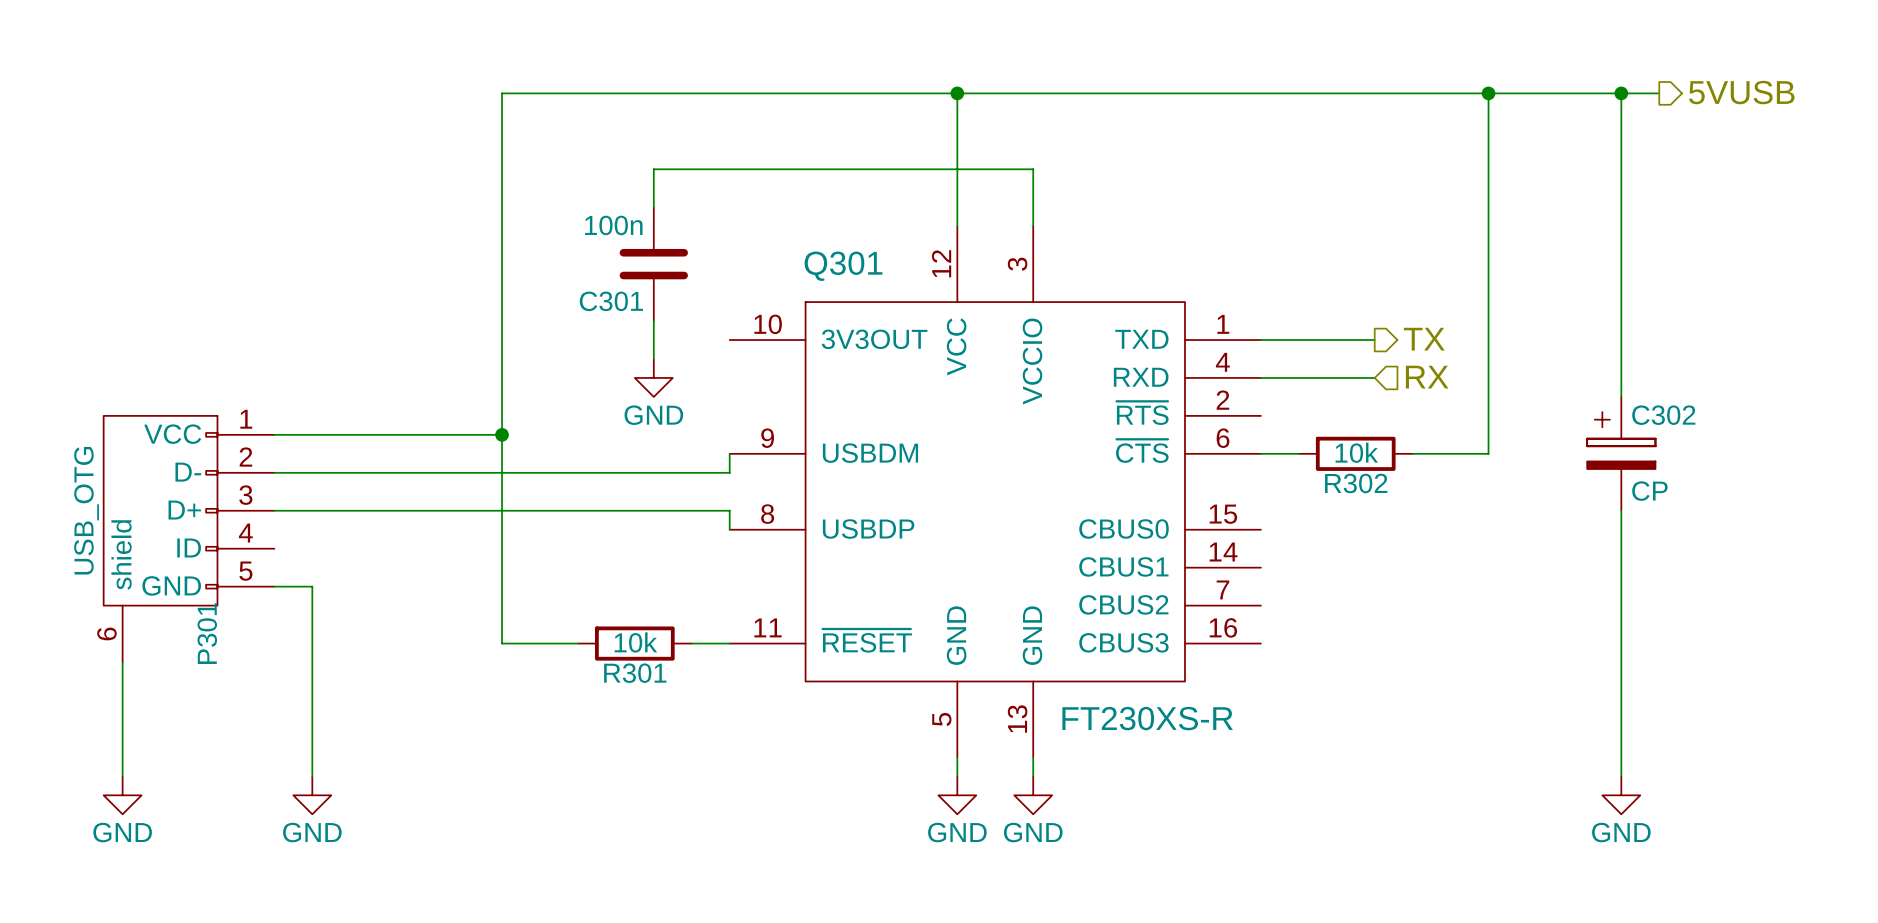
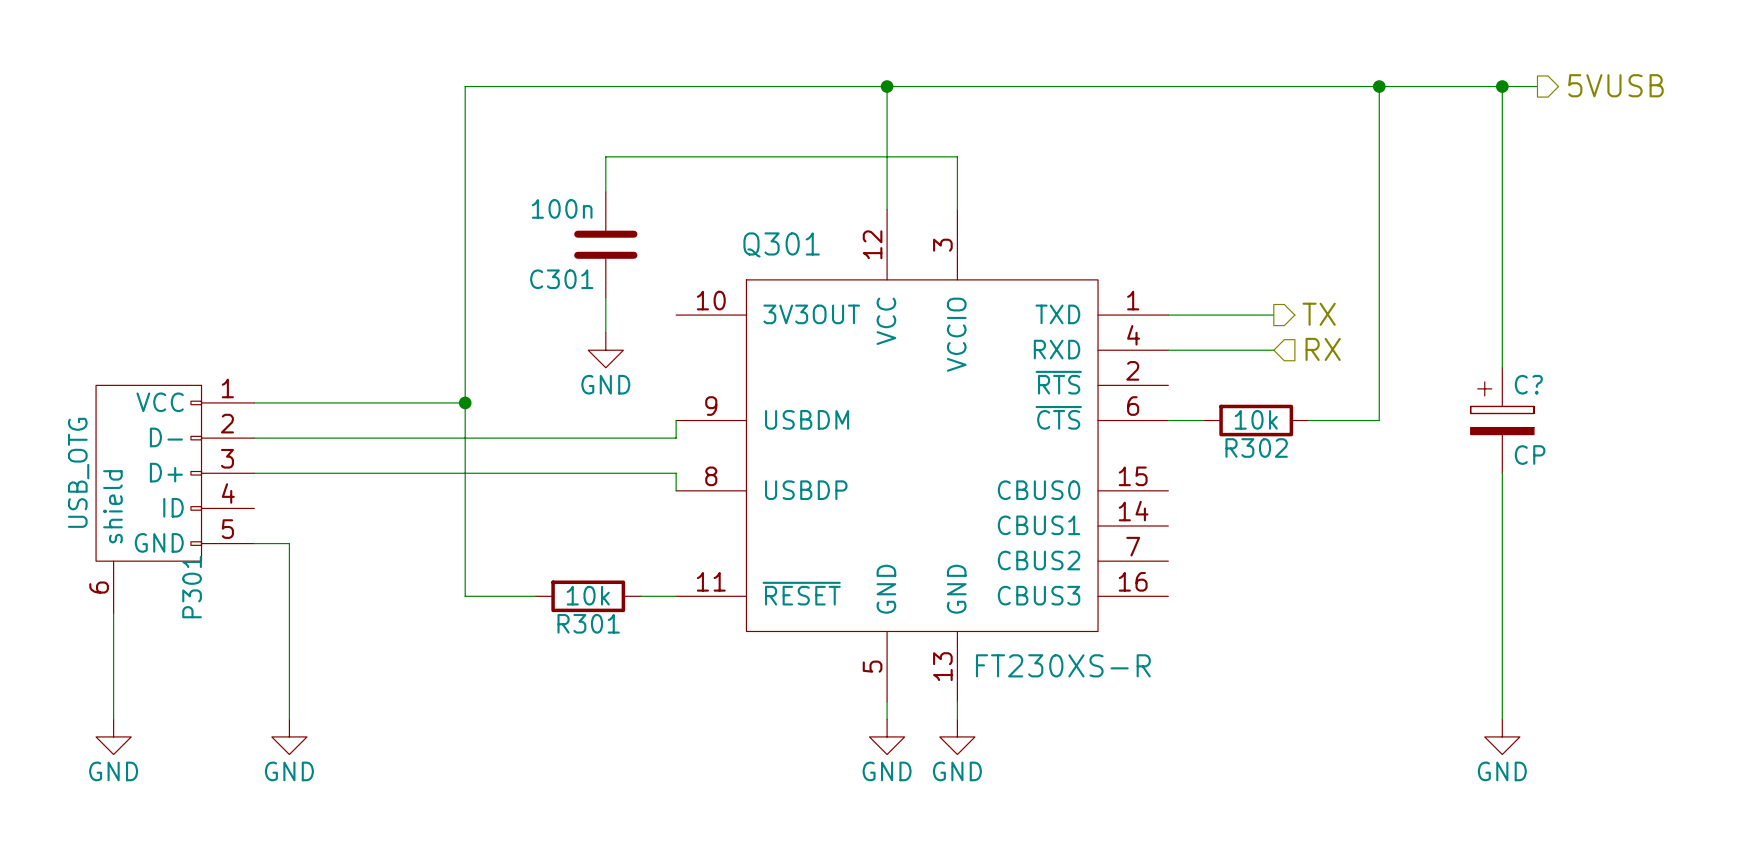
C302 name: C302 (1663, 415) -> C? (1528, 384)

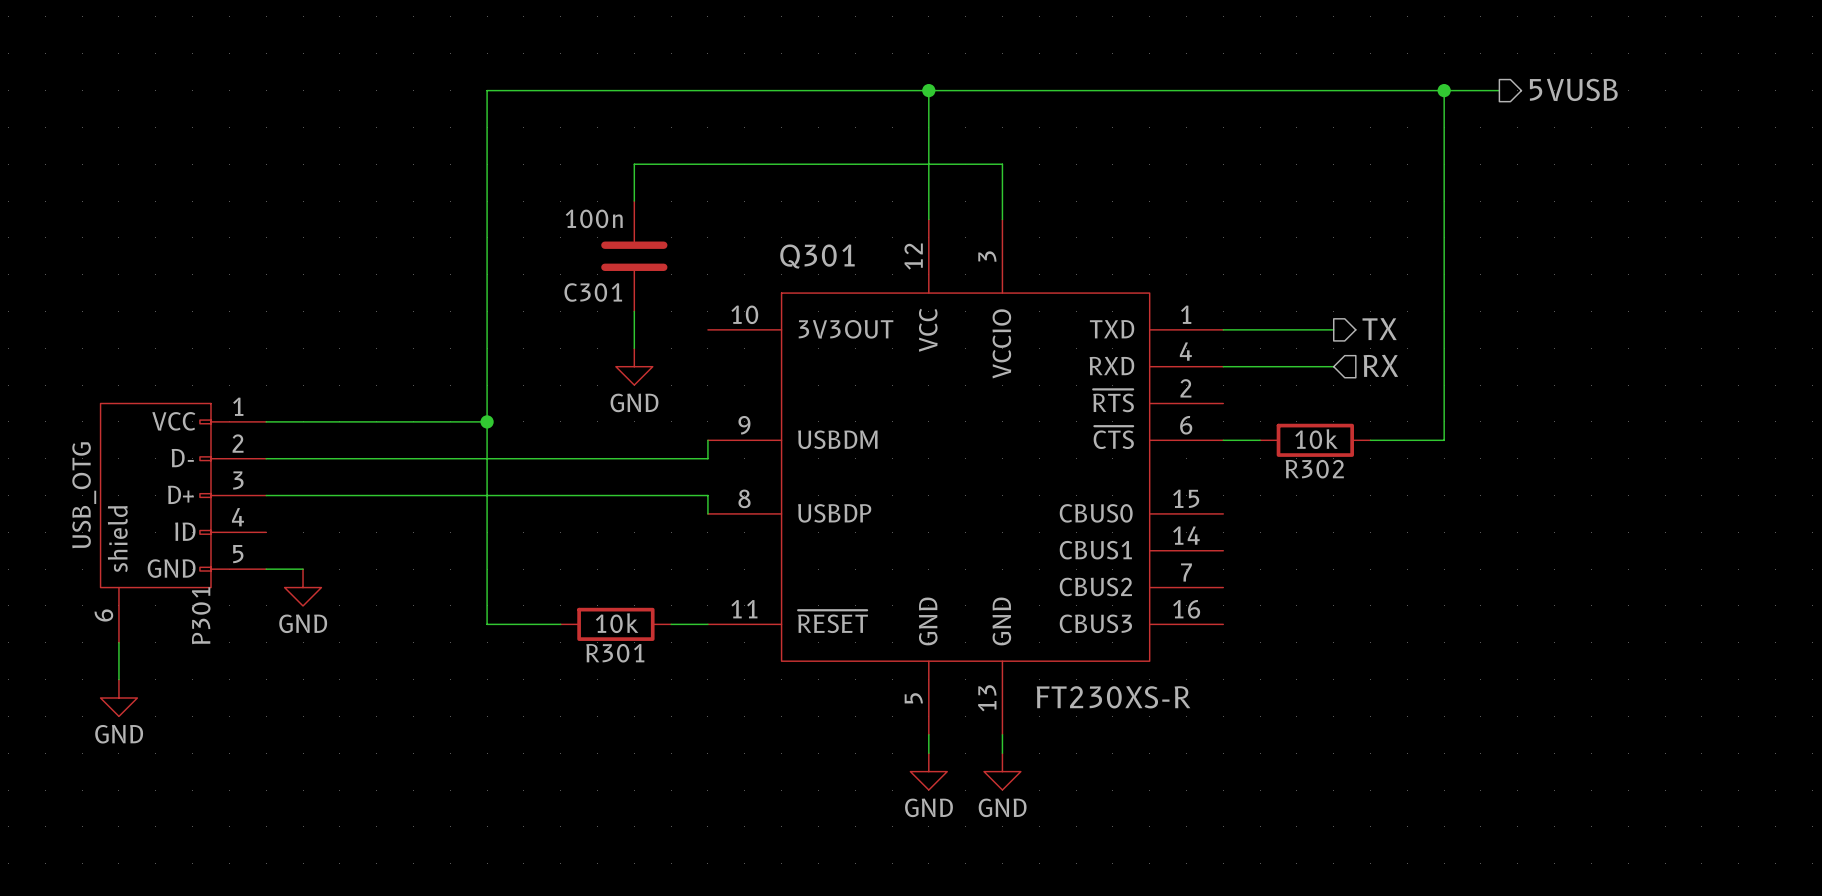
hierarchical label position: 5VUSB (1615, 85) -> 5VUSB (1573, 89)
wire: (1432, 86) (1537, 86) -> none
wire: (1502, 86) (1502, 367) -> none
junction: (1502, 86) -> none
C?: CP (1502, 420) -> none
wire: (1502, 473) (1502, 719) -> none
wire: (289, 543) (289, 719) -> none
power symbol: none -> GND (303, 587)
wire: (113, 649) (113, 719) -> none
power symbol position: GND (113, 736) -> GND (118, 697)
power symbol: GND (289, 736) -> none
power symbol: GND (1502, 736) -> none

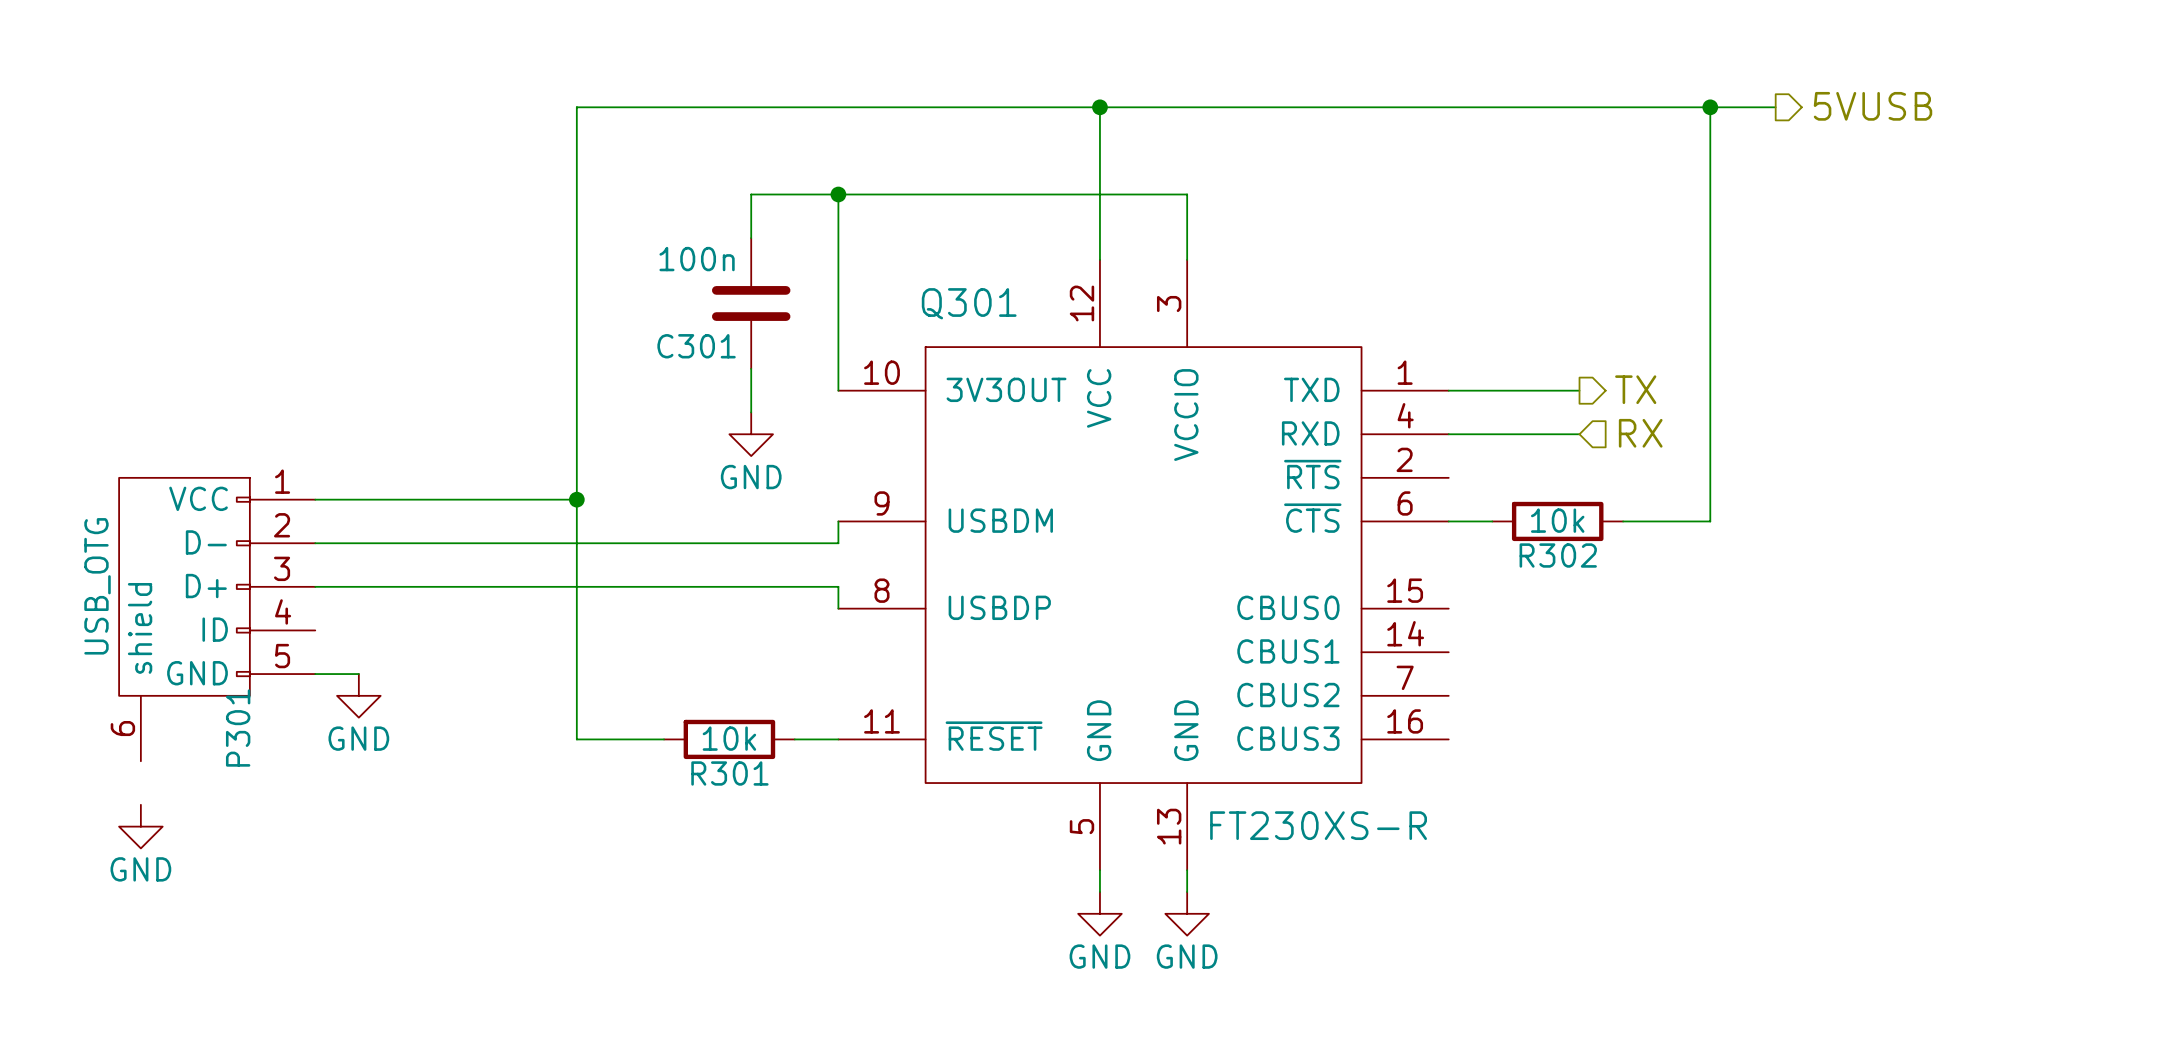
wire: none -> (838, 194) (838, 390)
junction: none -> (838, 194)
wire: (118, 642) (118, 679) -> none

